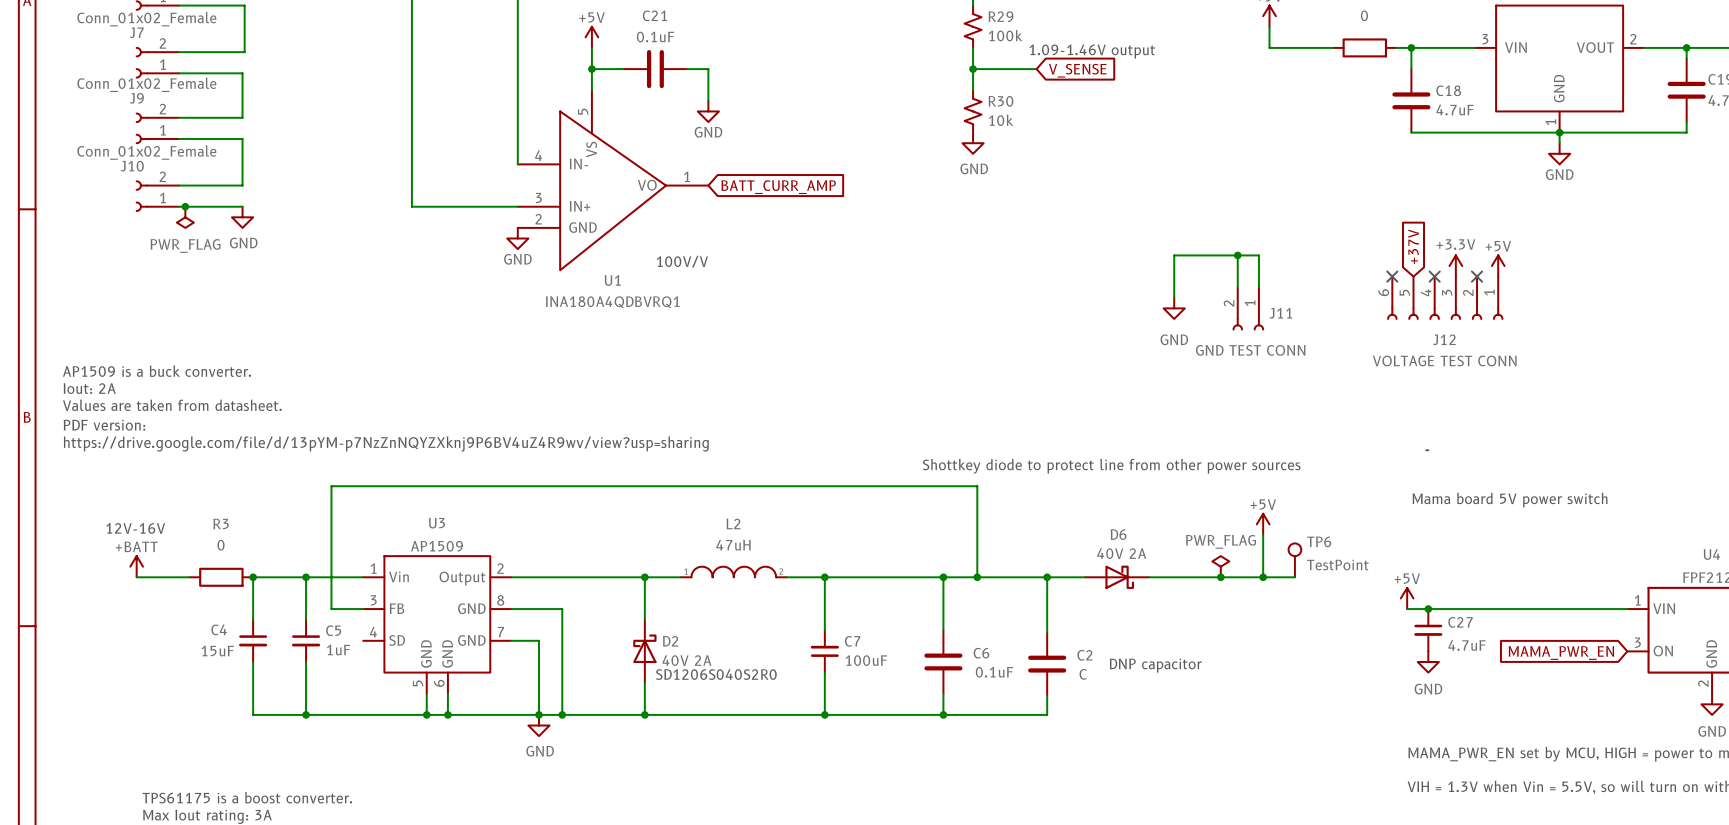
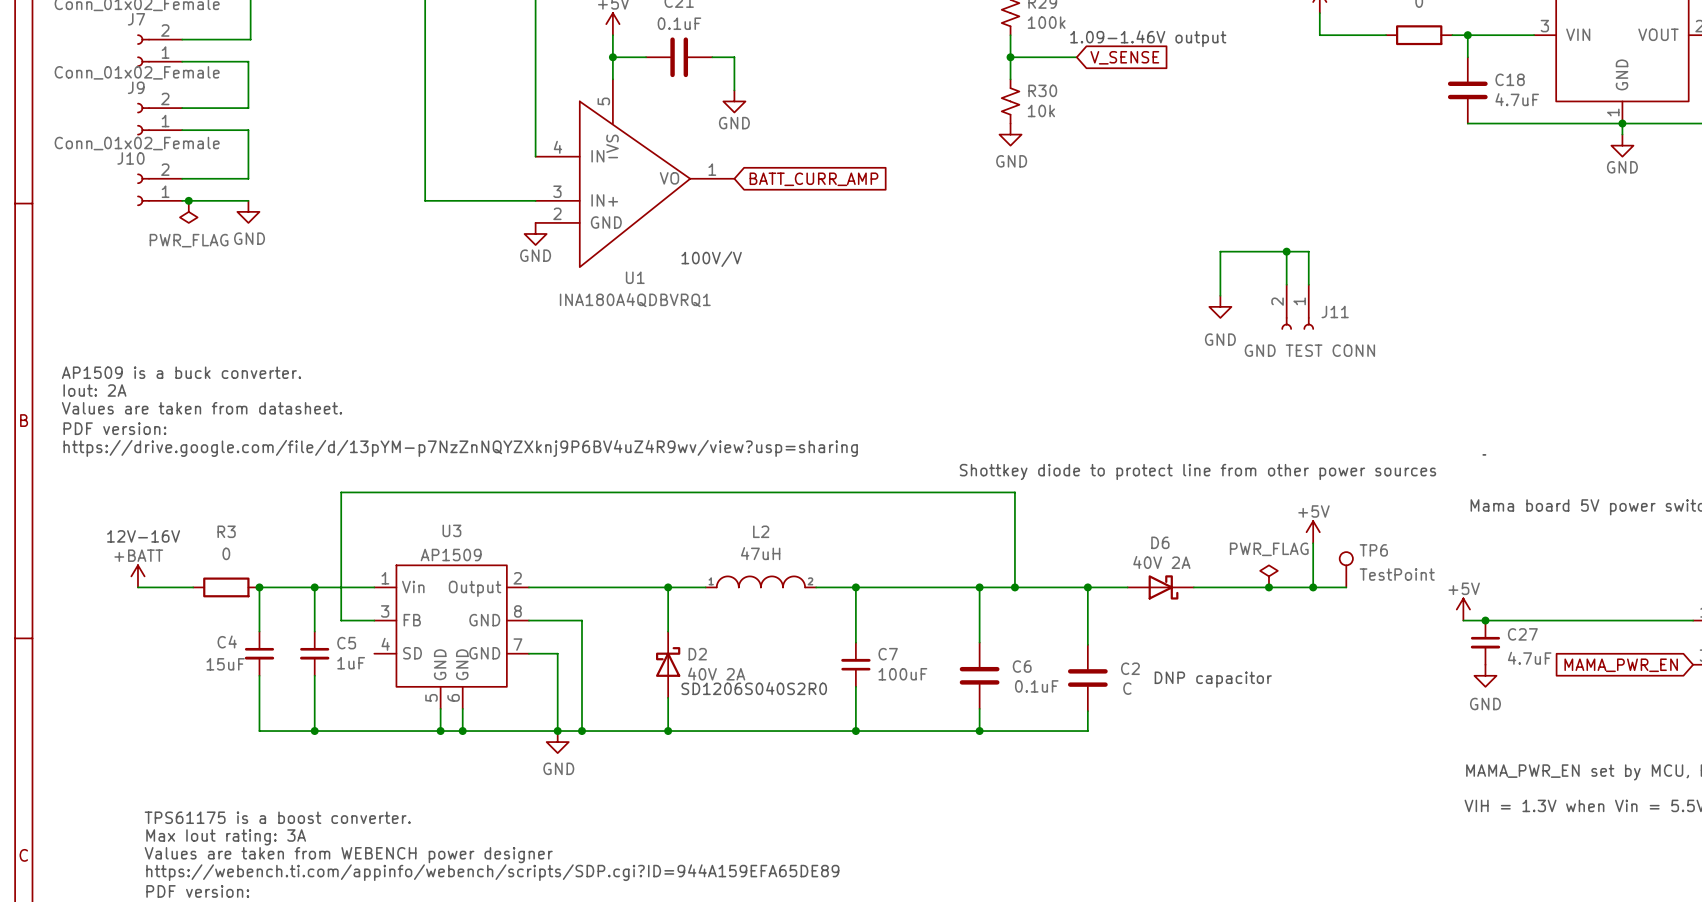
global label: +37V (1413, 246) -> none
power symbol: +3.3V (1455, 266) -> none
power symbol: +5V (1498, 266) -> none
no-connect mark: (1392, 276) -> none
no-connect mark: (1434, 276) -> none
no-connect mark: (1477, 276) -> none
J12: VOLTAGE TEST CONN (1445, 298) -> none

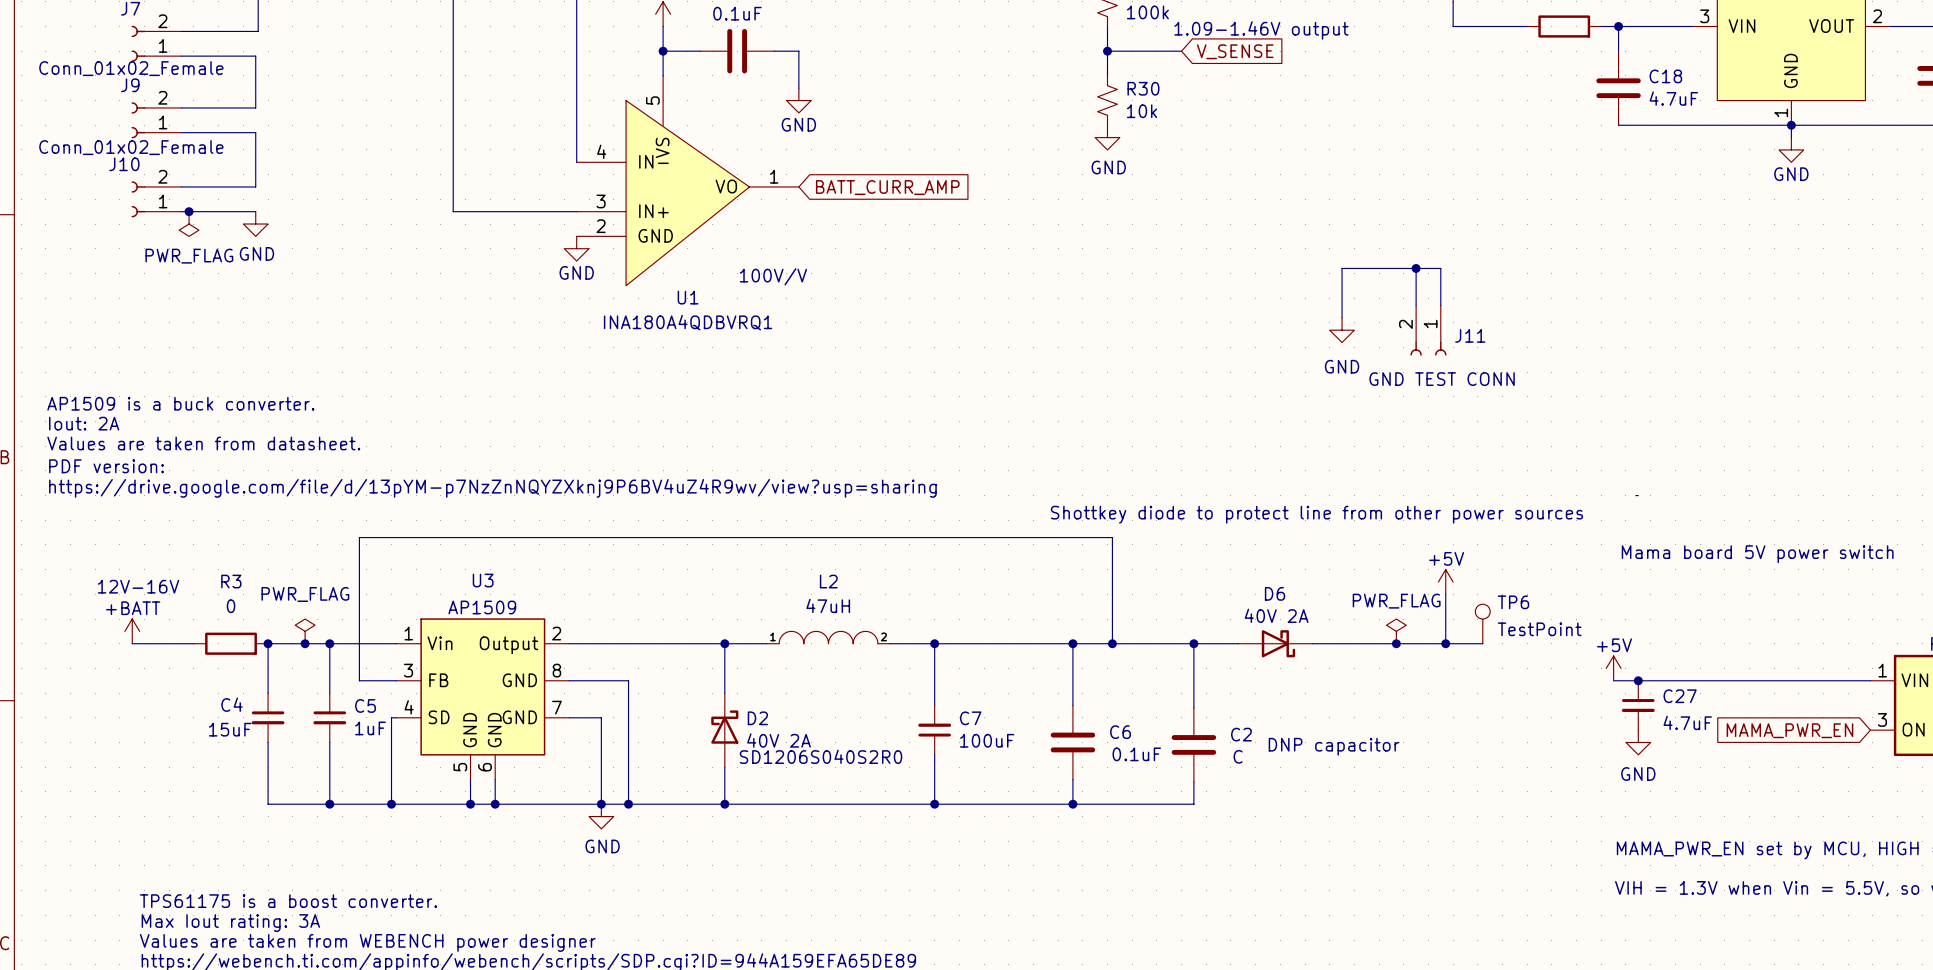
power symbol: none -> PWR_FLAG (305, 631)
junction: none -> (305, 643)
wire: none -> (396, 717) (391, 717) (391, 804)
junction: none -> (391, 804)

